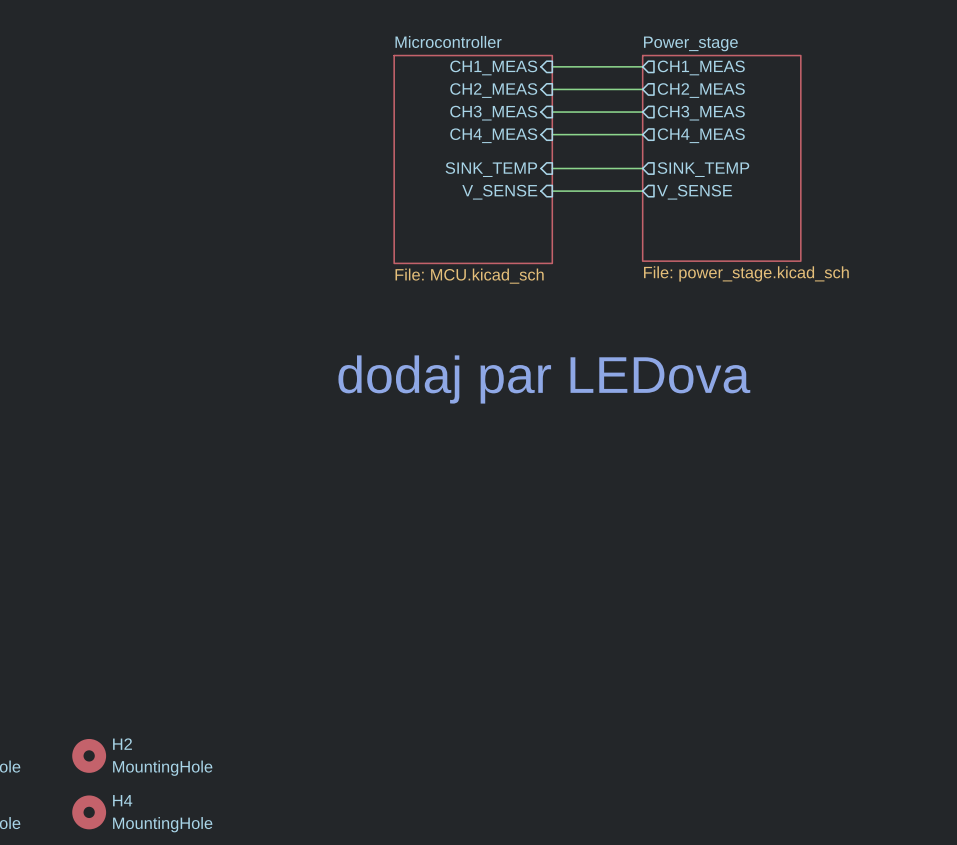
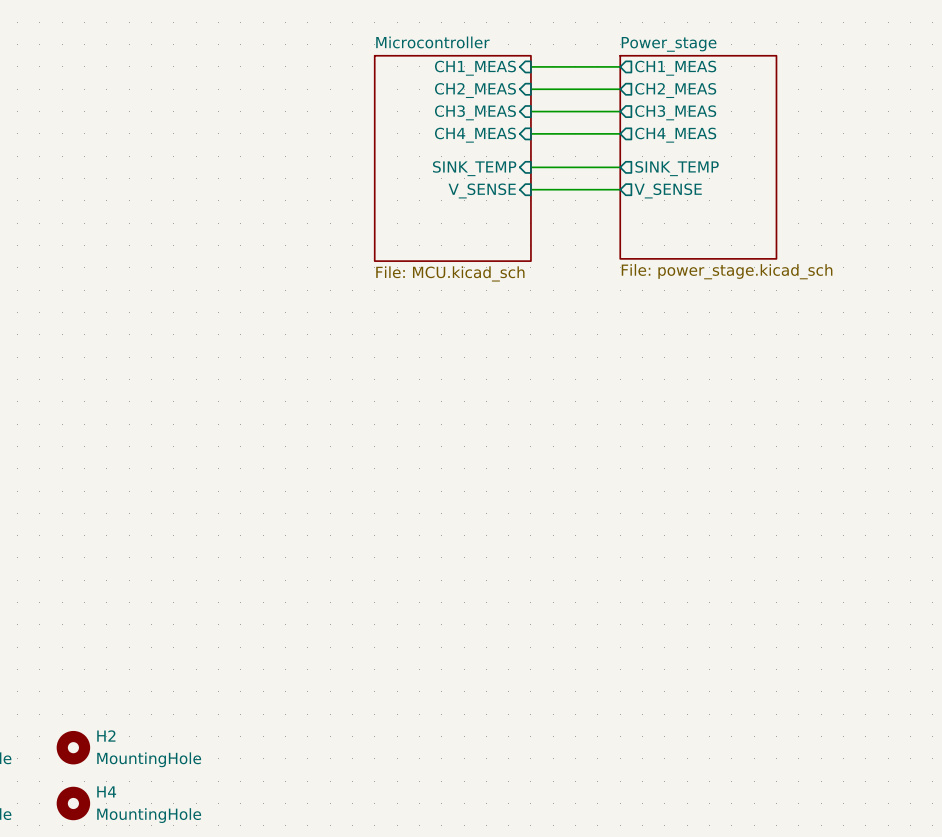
text: dodaj par LEDova (544, 379) -> none

